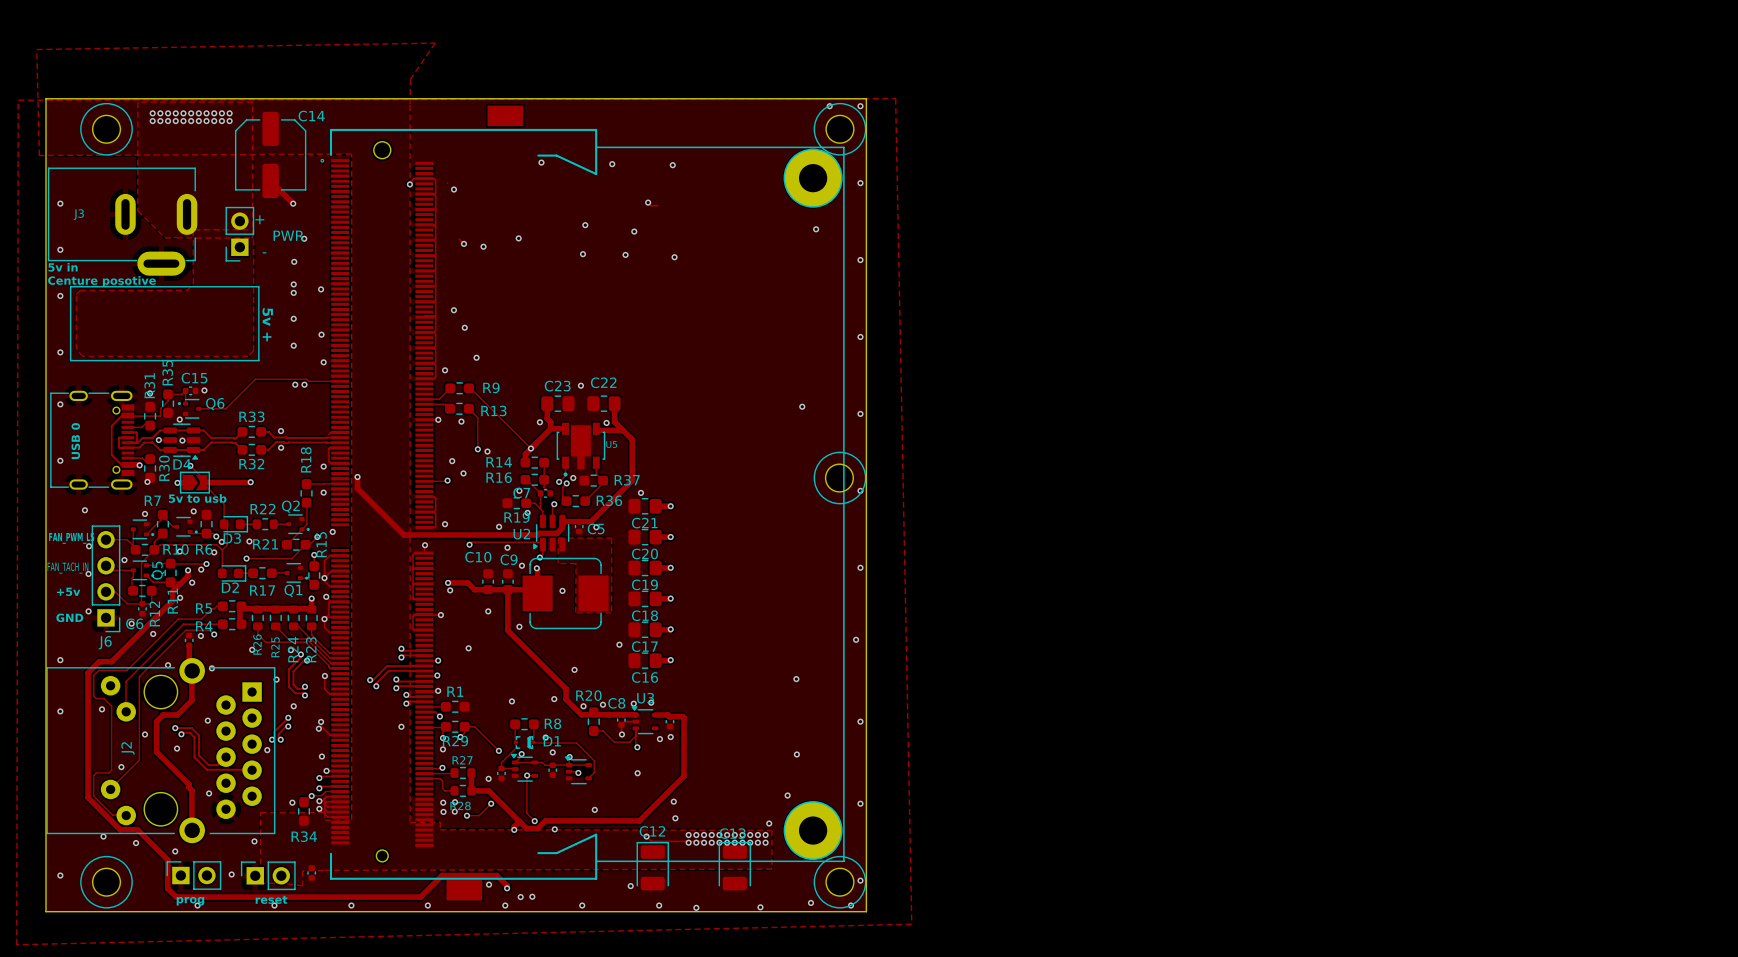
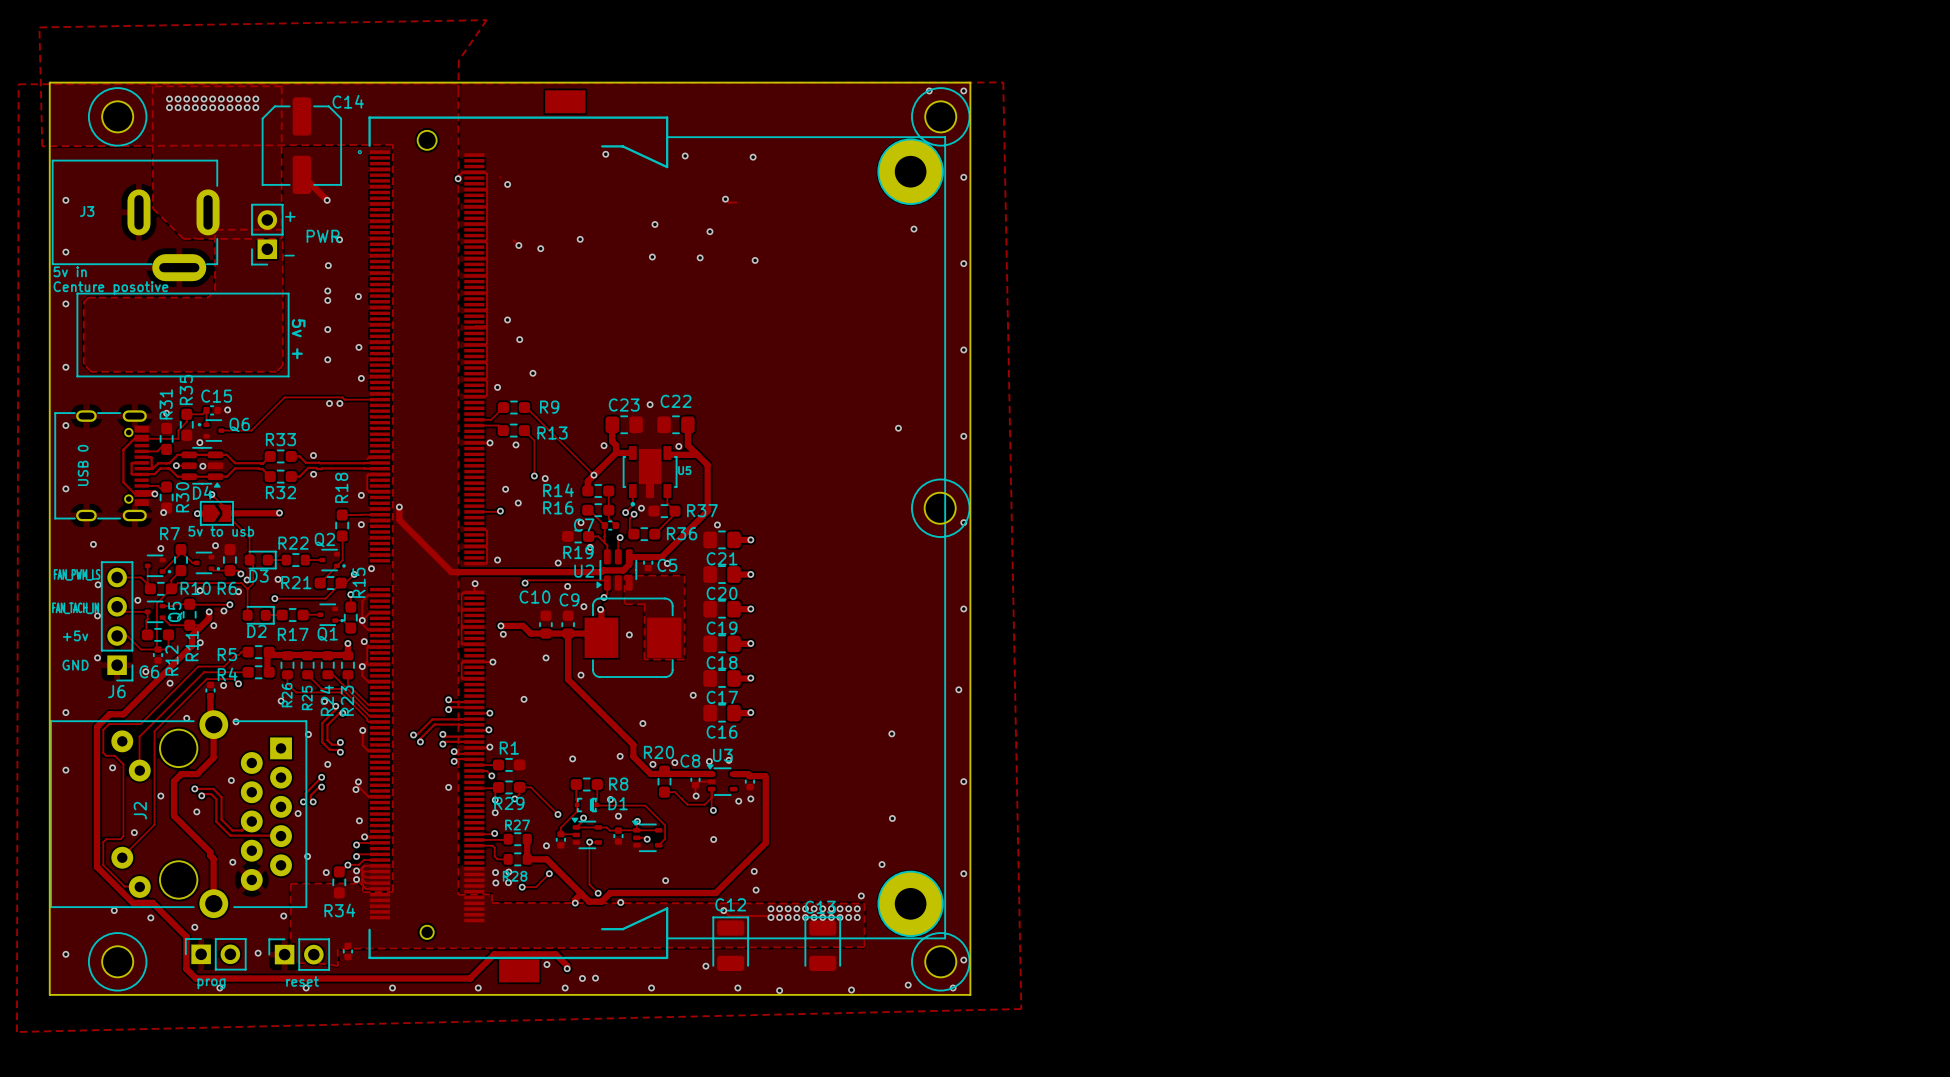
via: none -> (307, 856)

